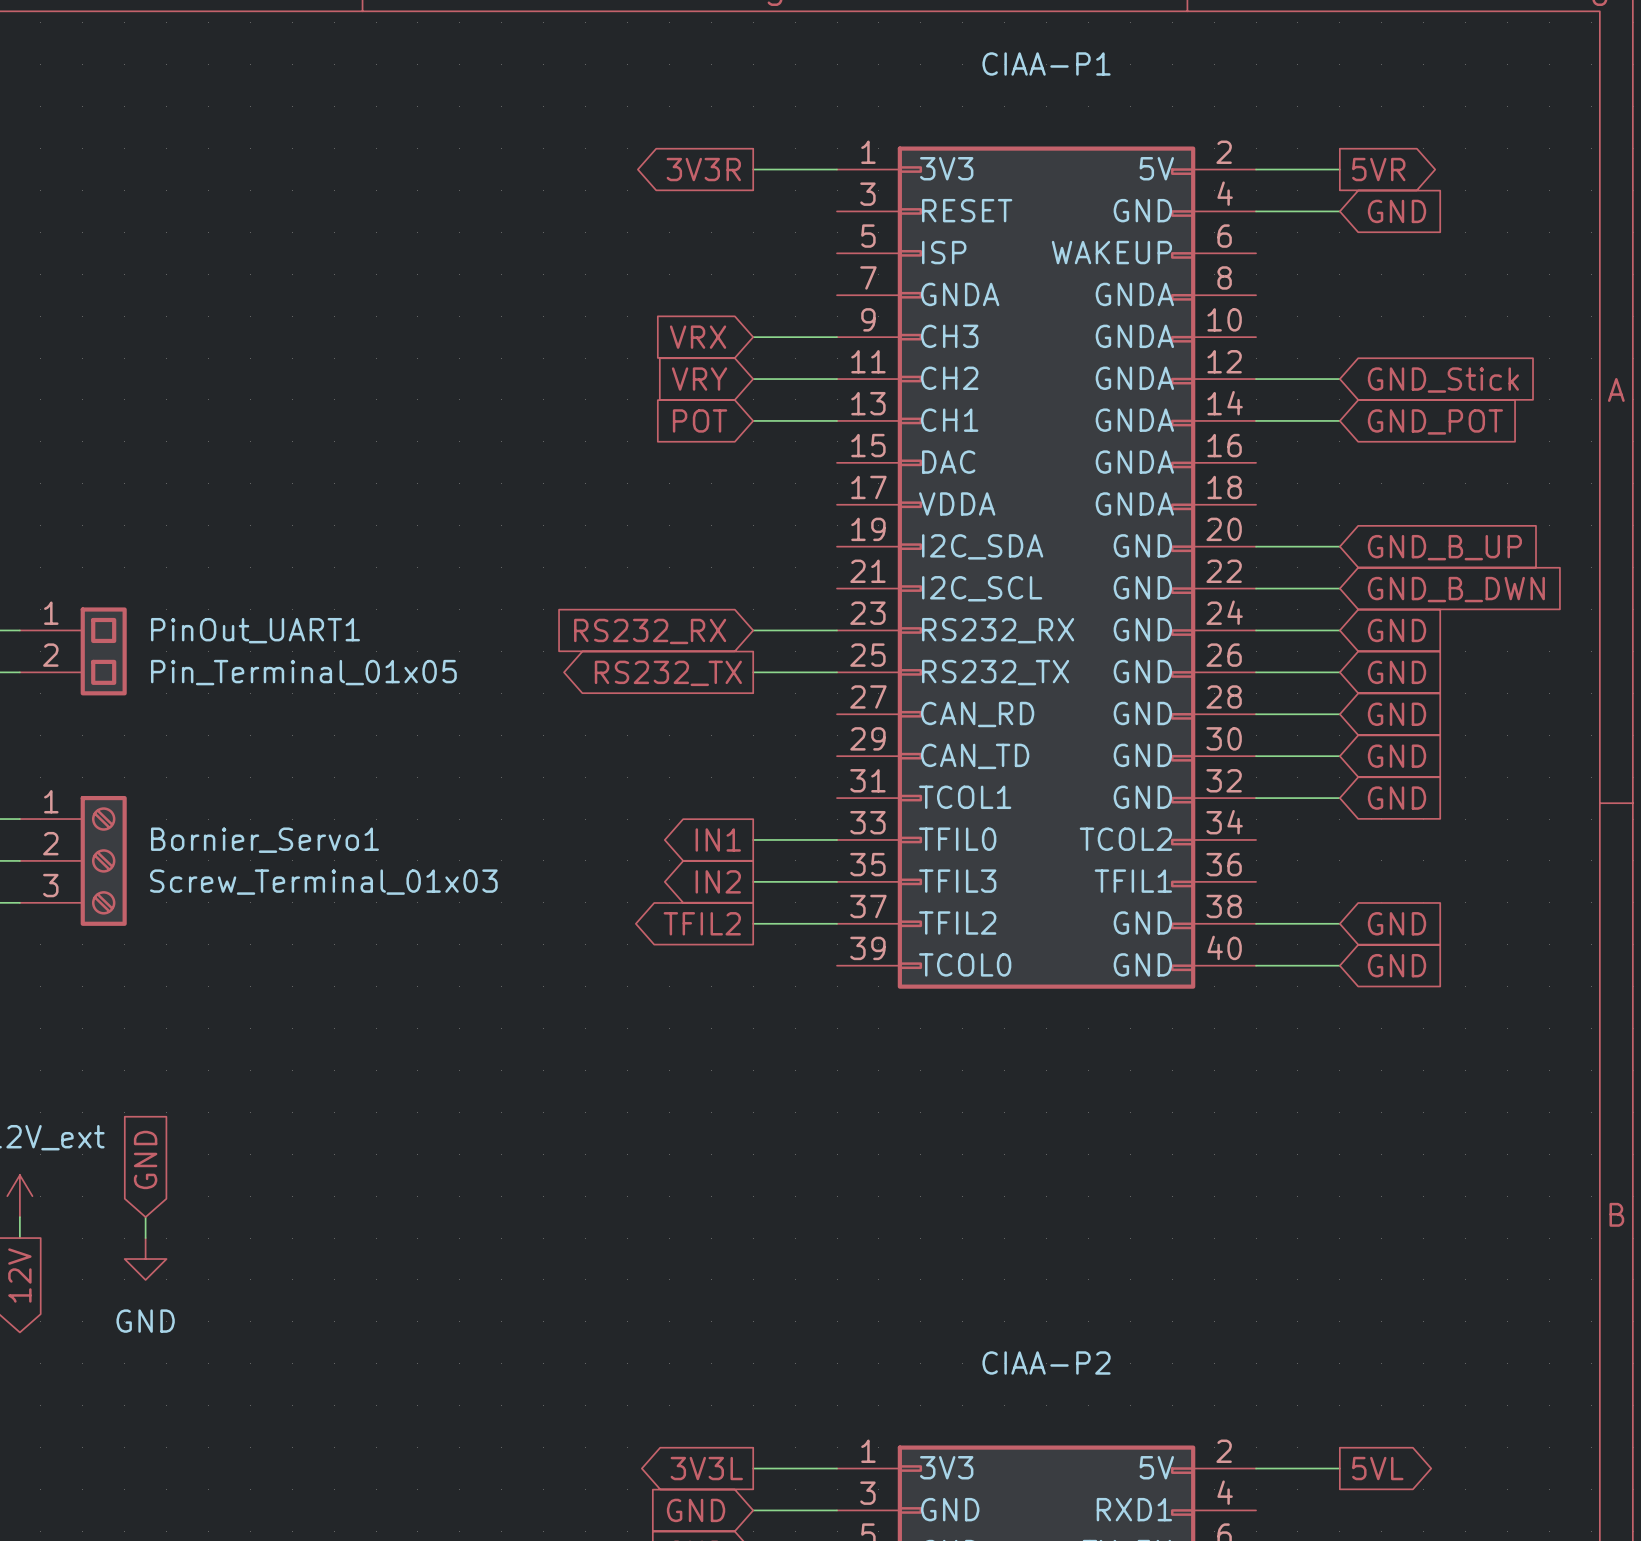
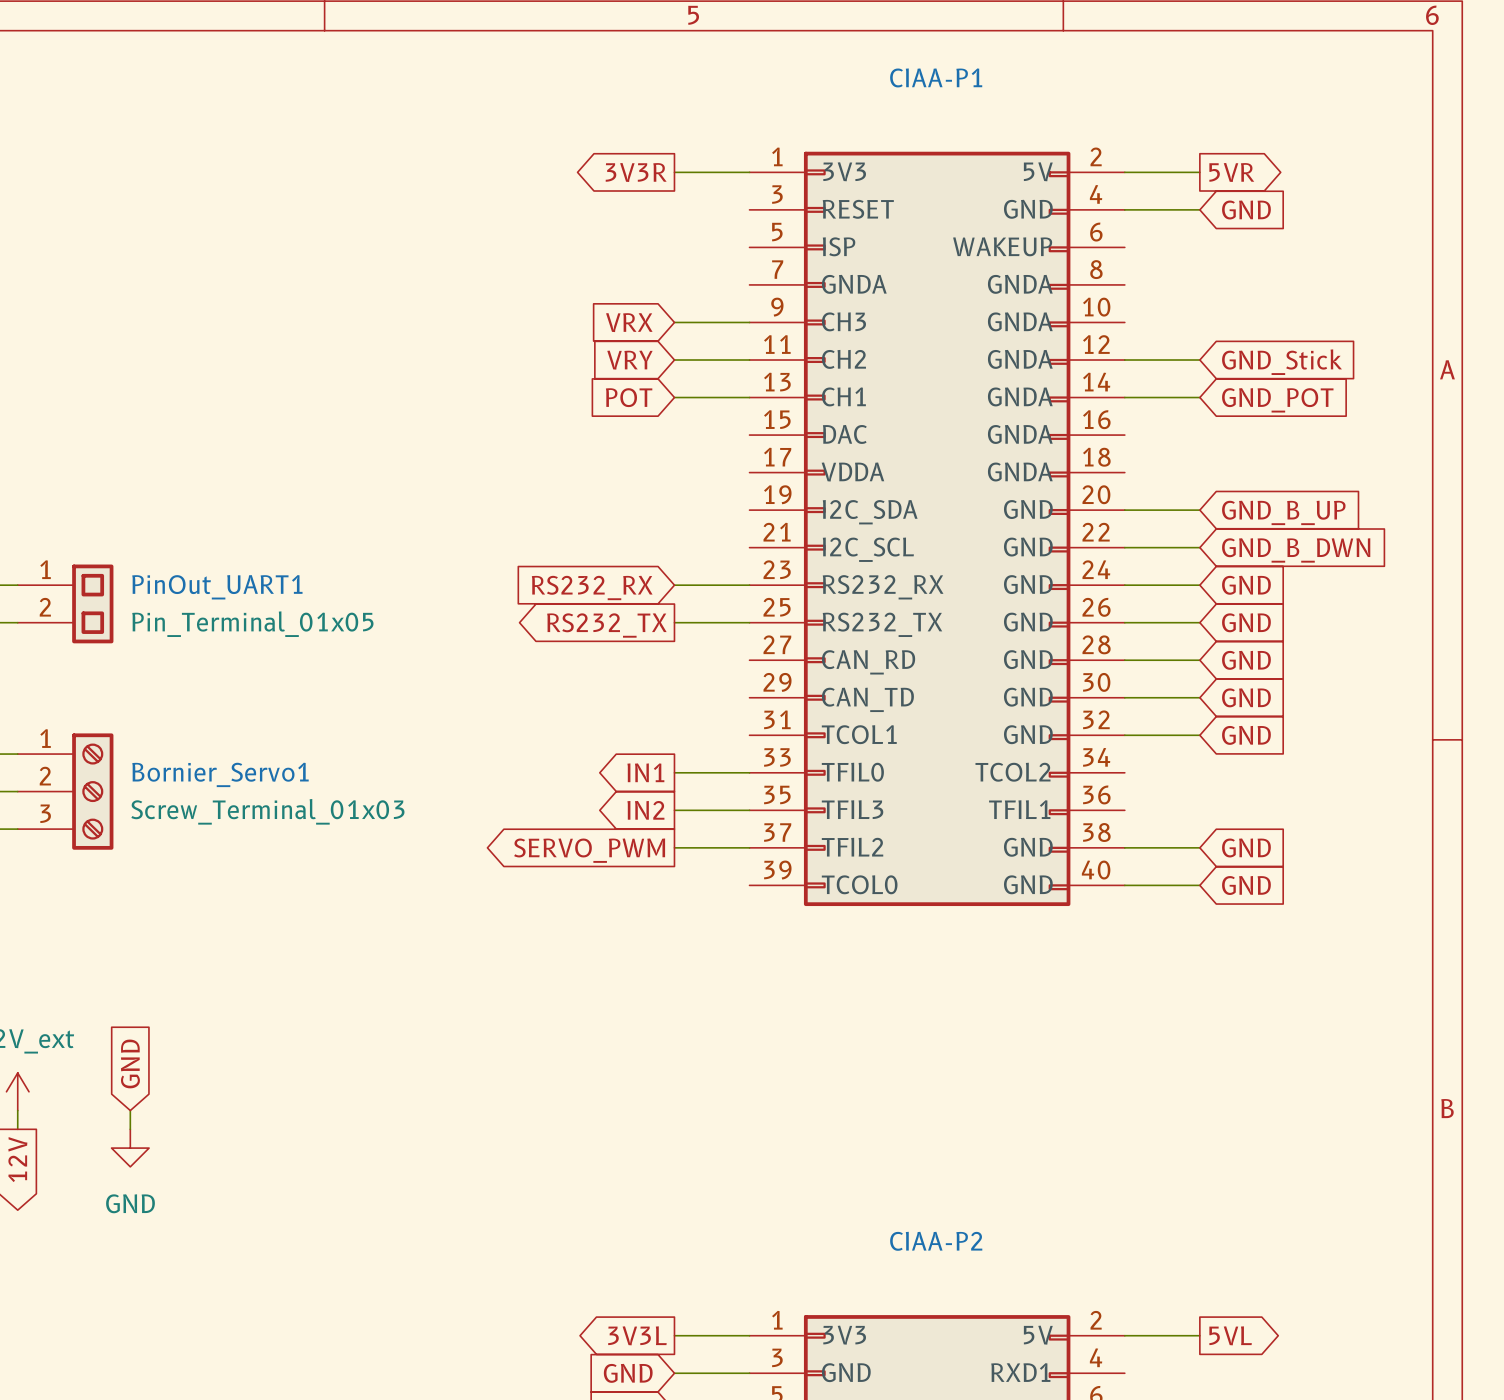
global label: TFIL2 (702, 923) -> SERVO_PWM (589, 850)

